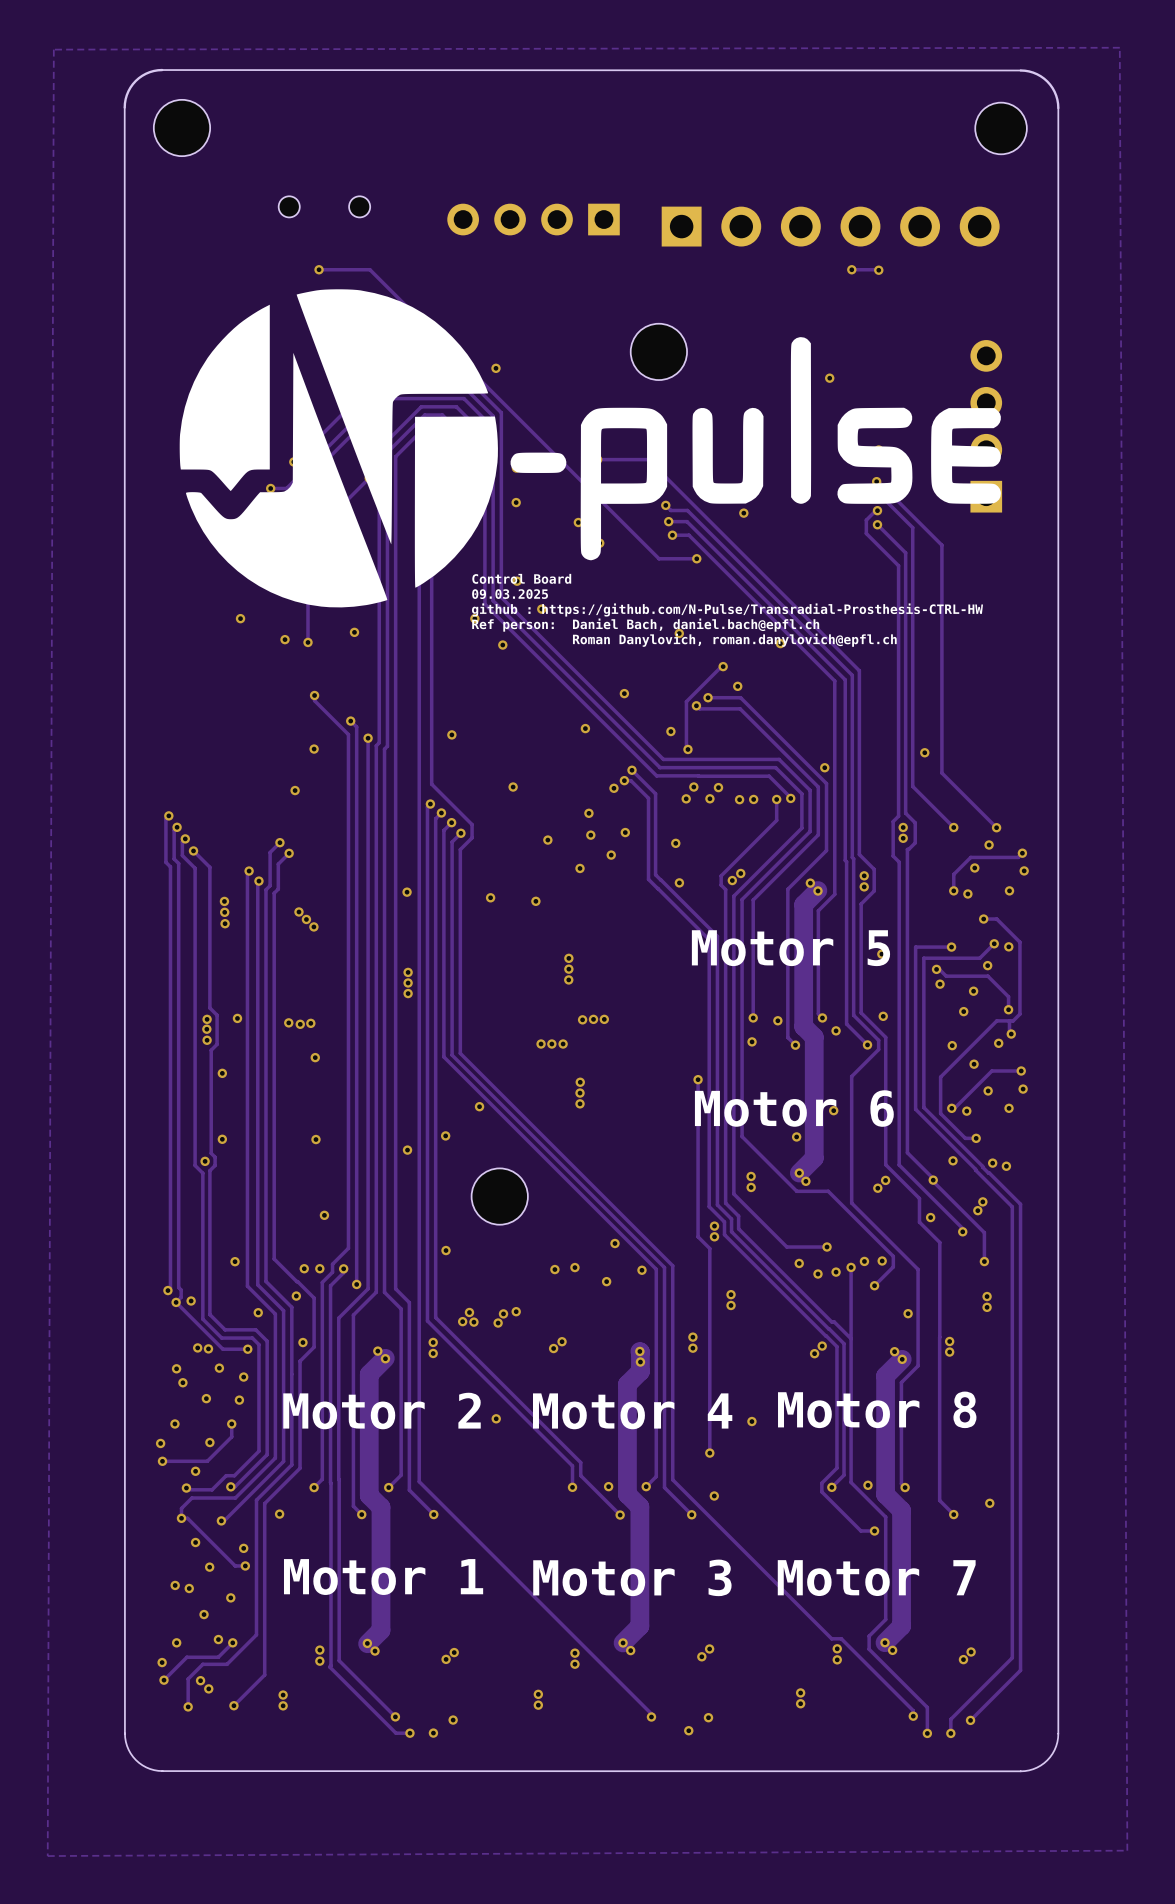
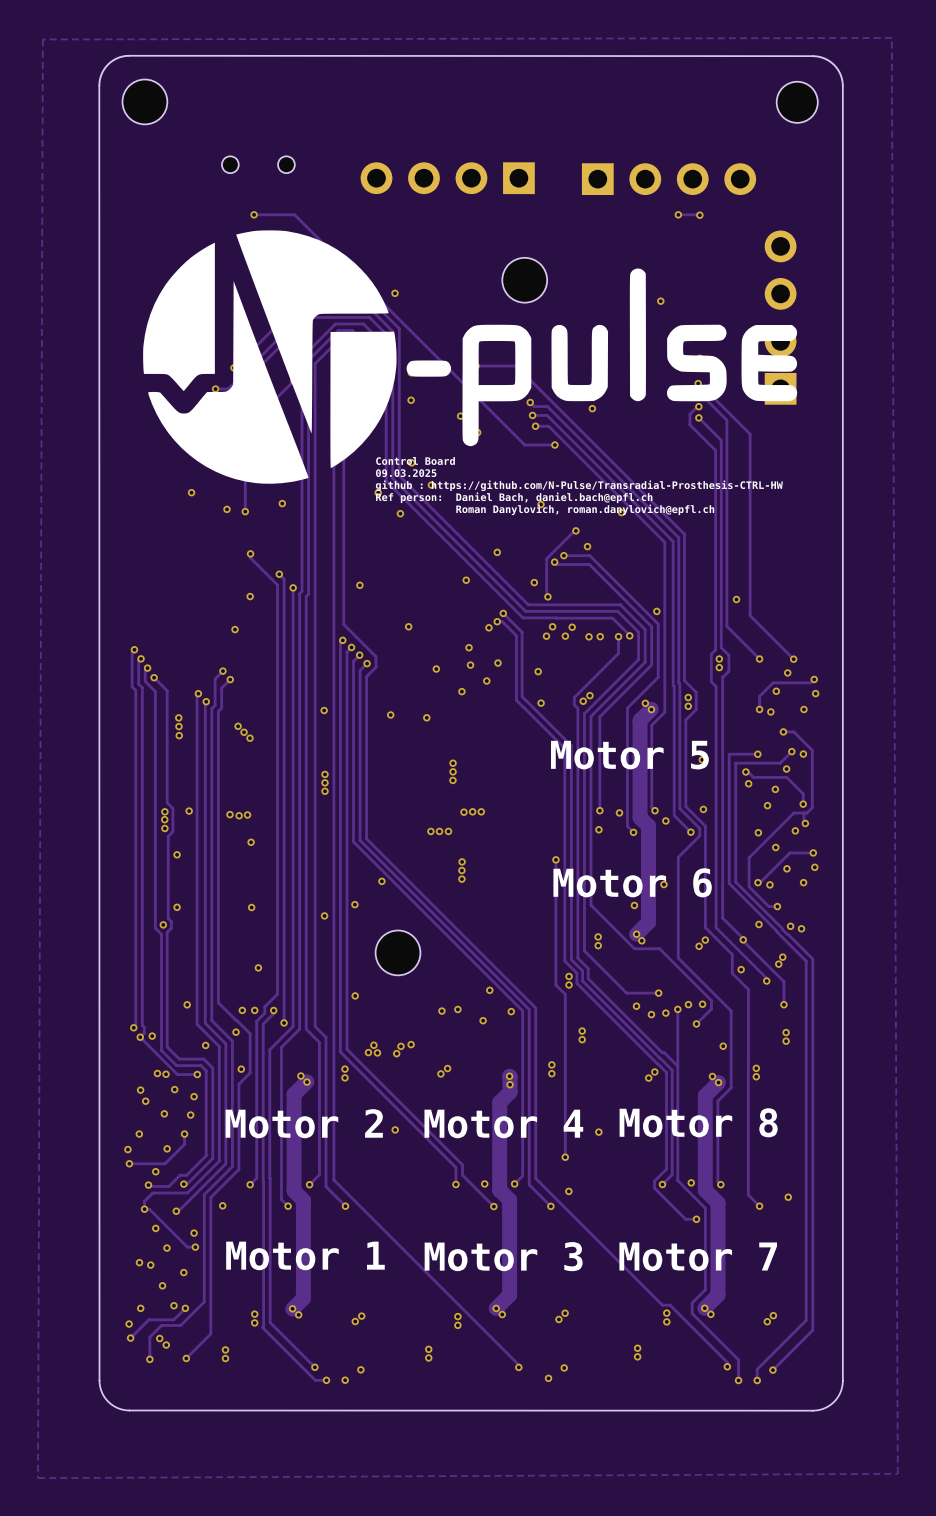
part footprint: [661, 206, 1000, 247] -> [581, 163, 757, 196]
part: (533, 219) -> none
part: none -> (447, 178)
part: none -> (780, 317)
part: (986, 426) -> none

